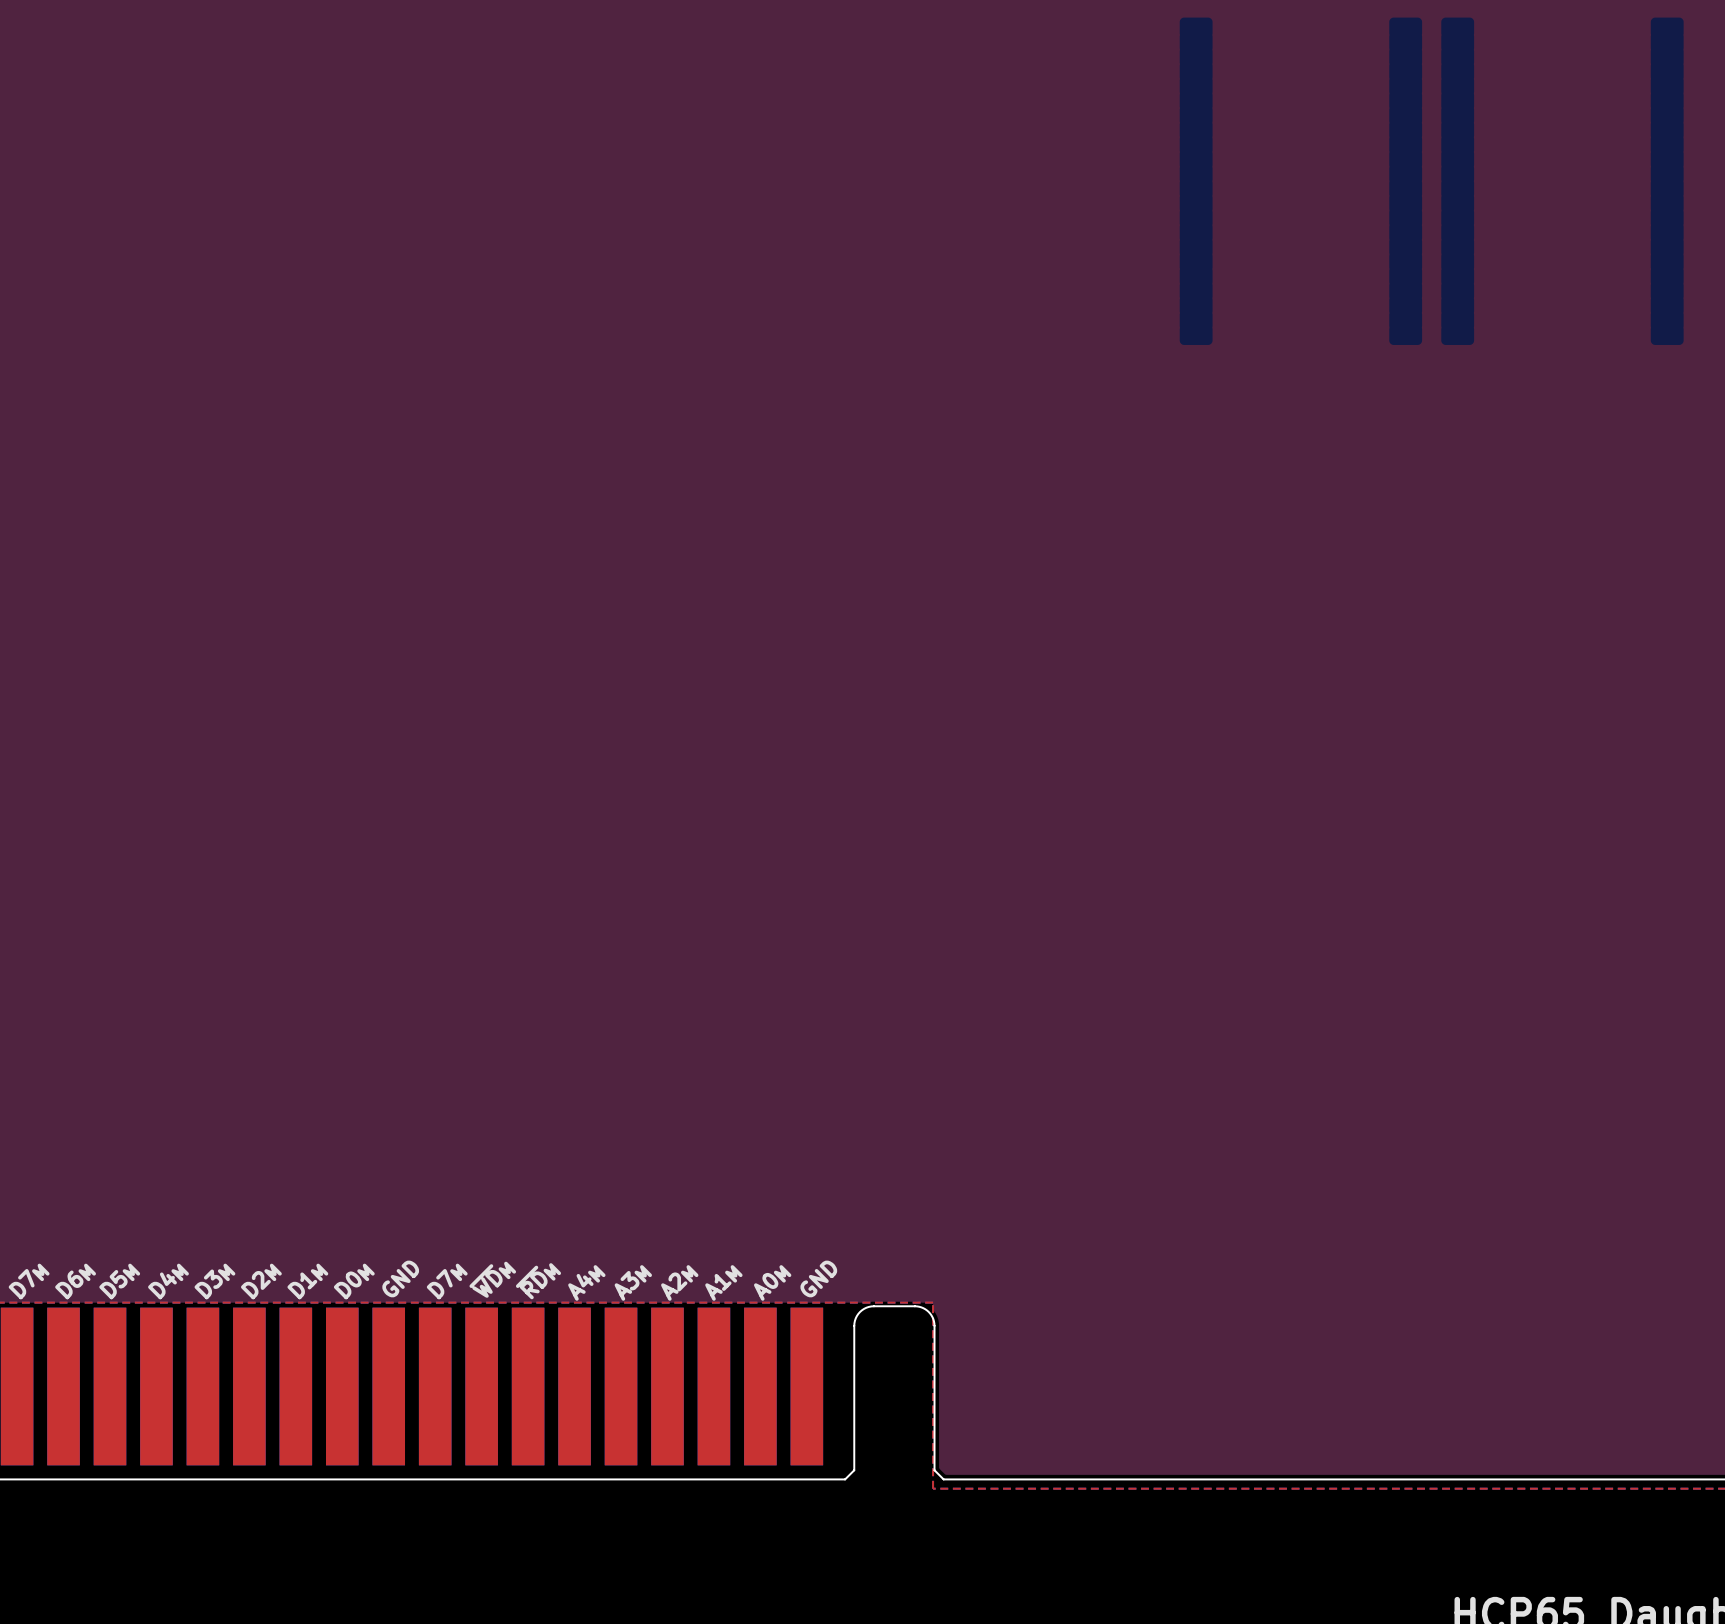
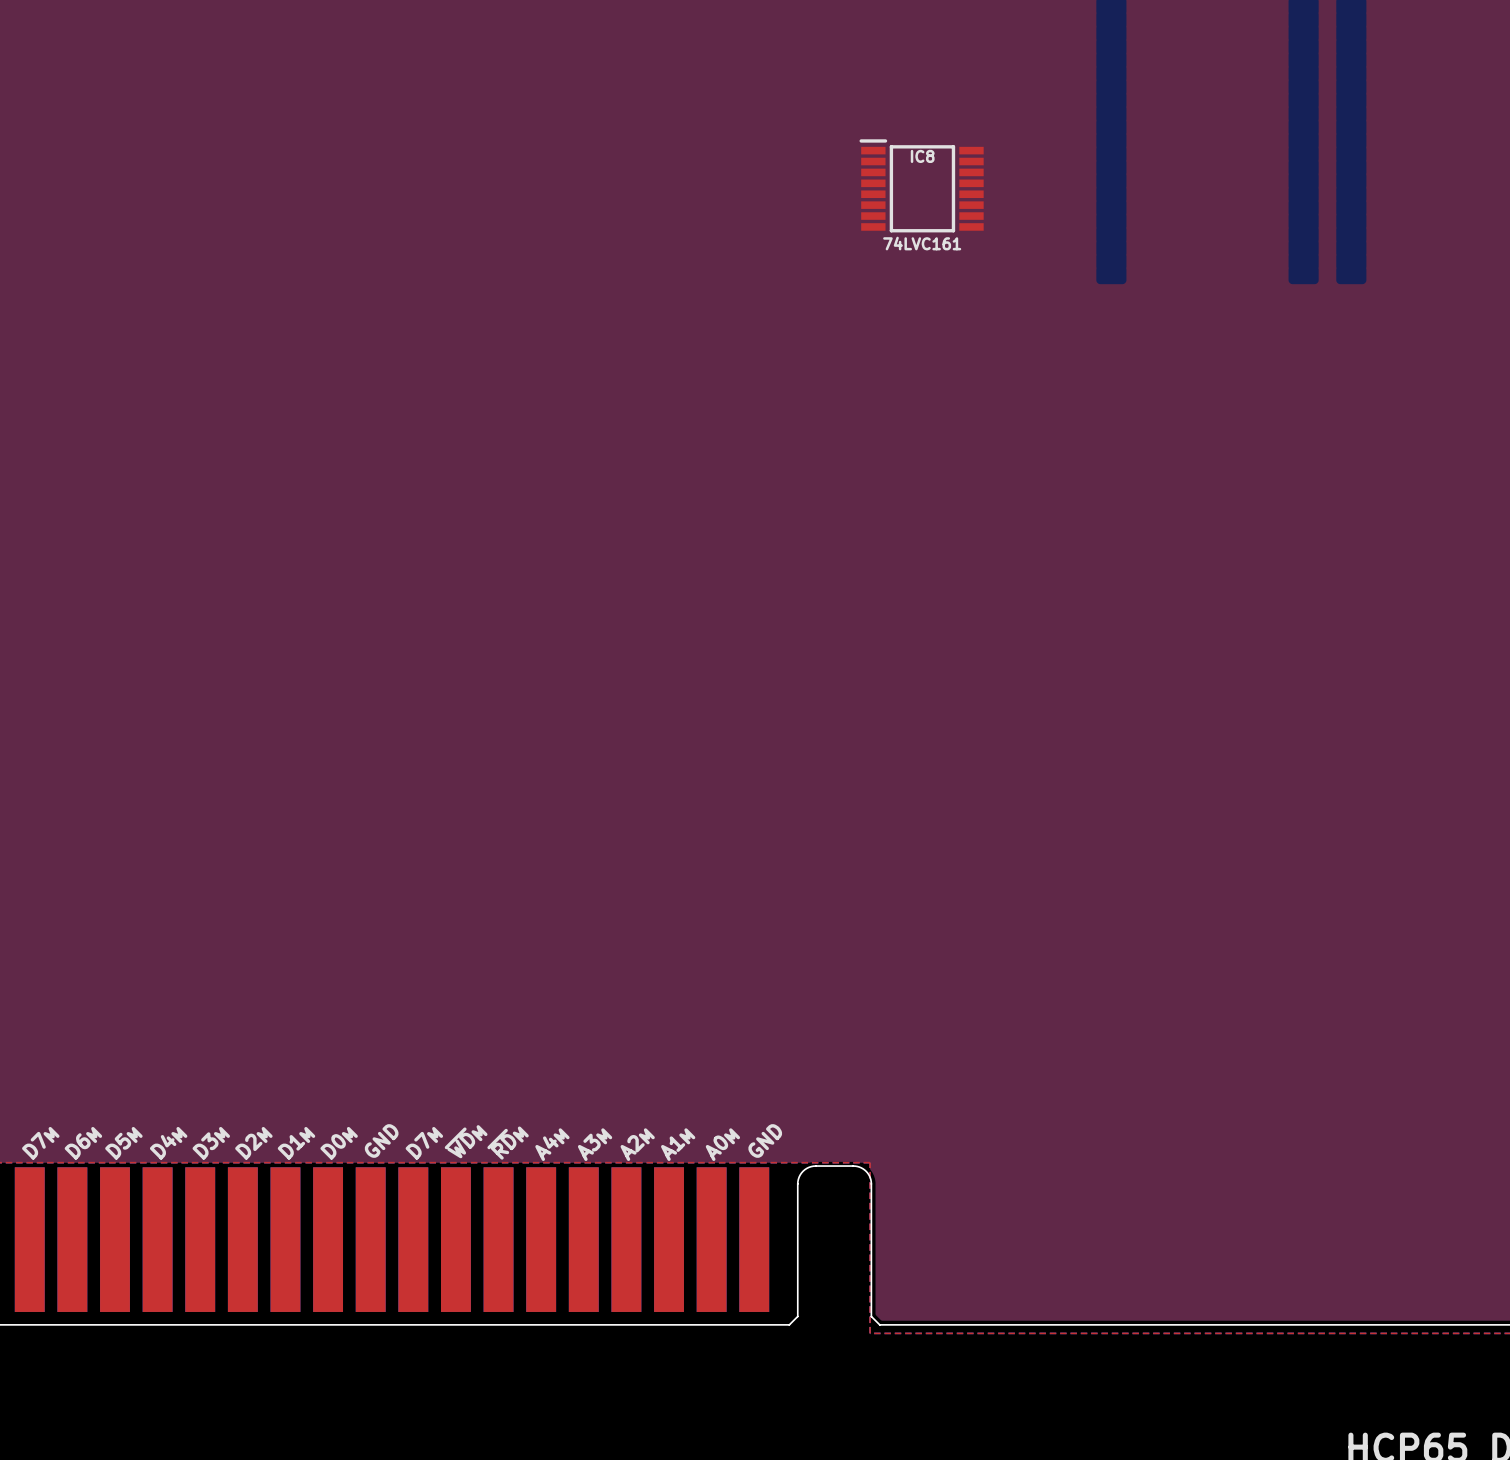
IC8: none -> (921, 185)

